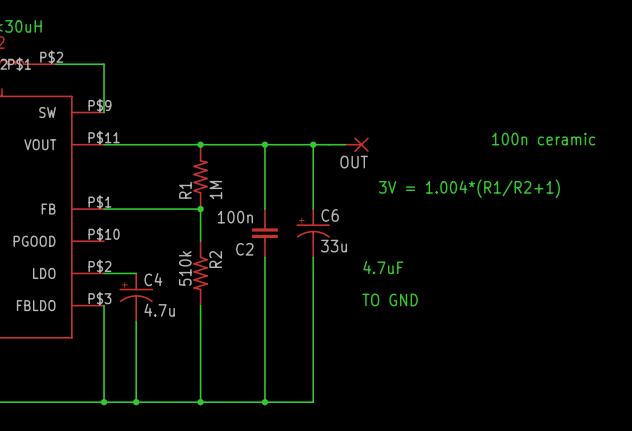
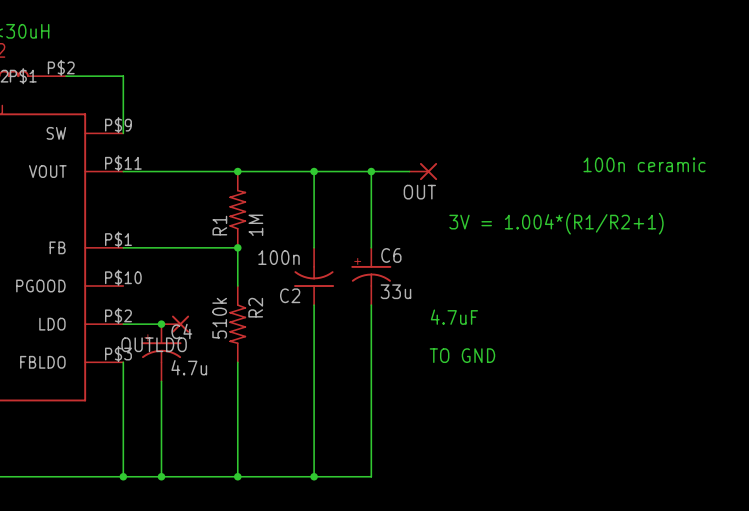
C2 symbol: [252, 209, 278, 258] -> [294, 247, 335, 306]
junction: none -> (161, 324)
OUTLDO: none -> (175, 324)

